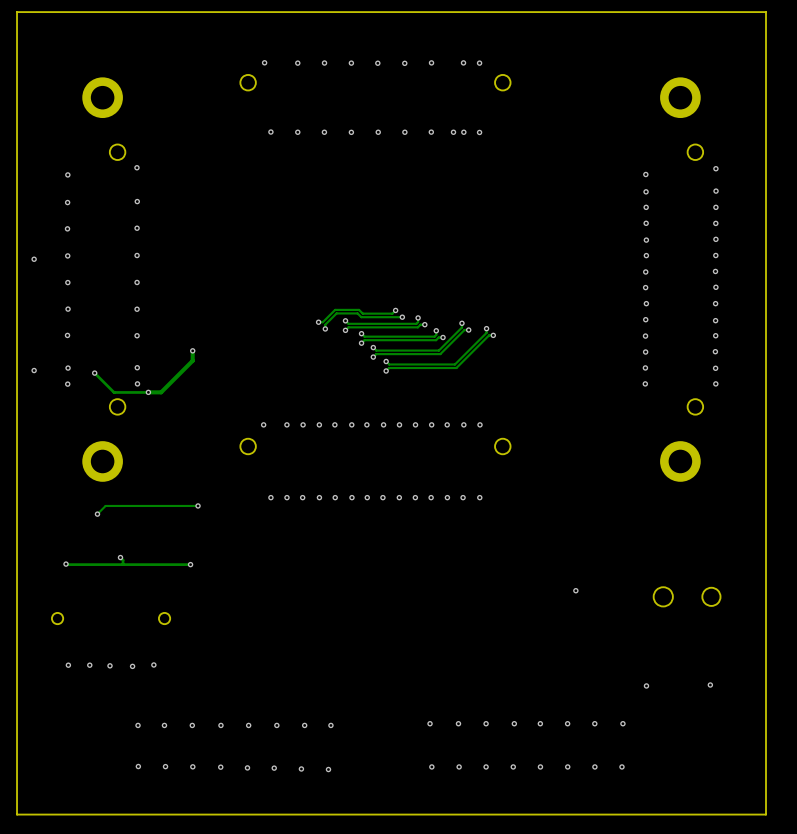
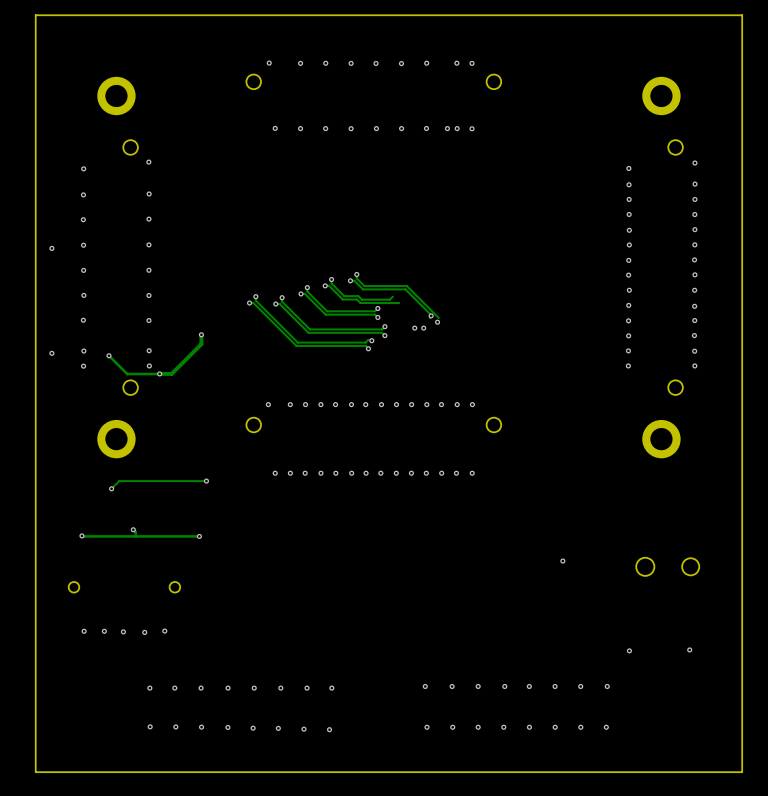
track: none -> (356, 274) (356, 278) (364, 286) (406, 286) (438, 318)
via: none -> (356, 274)
via: none -> (331, 279)
track: none -> (350, 280) (354, 280) (363, 289) (405, 289) (429, 313) (429, 318)
via: none -> (350, 280)
via: none -> (325, 285)
track: none -> (307, 287) (307, 291) (327, 311) (375, 311) (377, 308)
via: none -> (307, 287)
track: none -> (301, 293) (304, 293) (325, 314) (375, 314) (377, 317)
via: none -> (301, 293)
track: (344, 309) (335, 309) (322, 322) (318, 322) -> (344, 296) (331, 283) (331, 279)
track: none -> (255, 296) (255, 300) (297, 342) (365, 342) (368, 339)
via: none -> (255, 296)
via: (395, 310) -> none
track: none -> (282, 297) (282, 301) (309, 329) (382, 329) (384, 326)
via: none -> (282, 297)
track: (342, 313) (336, 313) (325, 324) (325, 328) -> (342, 299) (329, 285) (325, 285)
track: none -> (249, 303) (253, 303) (296, 345) (365, 345) (368, 348)
via: none -> (249, 303)
via: (402, 317) -> none
track: (418, 317) (416, 323) (348, 323) (345, 320) -> none
via: (418, 317) -> none
track: none -> (275, 304) (279, 304) (308, 332) (382, 332) (384, 335)
via: none -> (275, 304)
via: (345, 320) -> none
via: (318, 322) -> none
via: none -> (377, 308)
track: (461, 323) (461, 327) (438, 350) (376, 350) (373, 347) -> none
via: (461, 323) -> none
track: (424, 324) (420, 324) (417, 327) (348, 327) (345, 330) -> none
via: (424, 324) -> none
via: (325, 328) -> none
track: (486, 328) (486, 332) (454, 364) (389, 364) (386, 361) -> none
via: (486, 328) -> none
via: (345, 330) -> none
track: (436, 330) (434, 336) (364, 336) (361, 333) -> none
track: (468, 330) (464, 330) (440, 354) (376, 354) (373, 357) -> none
via: (468, 330) -> none
via: none -> (377, 317)
via: (361, 333) -> none
track: (493, 335) (489, 335) (456, 368) (389, 368) (386, 371) -> none
via: (493, 335) -> none
track: (443, 337) (438, 337) (436, 340) (364, 340) (361, 343) -> none
via: none -> (384, 326)
via: (361, 343) -> none
via: none -> (414, 328)
via: none -> (423, 328)
via: (373, 347) -> none
via: none -> (384, 335)
via: (386, 361) -> none
via: none -> (368, 348)
via: (386, 371) -> none

